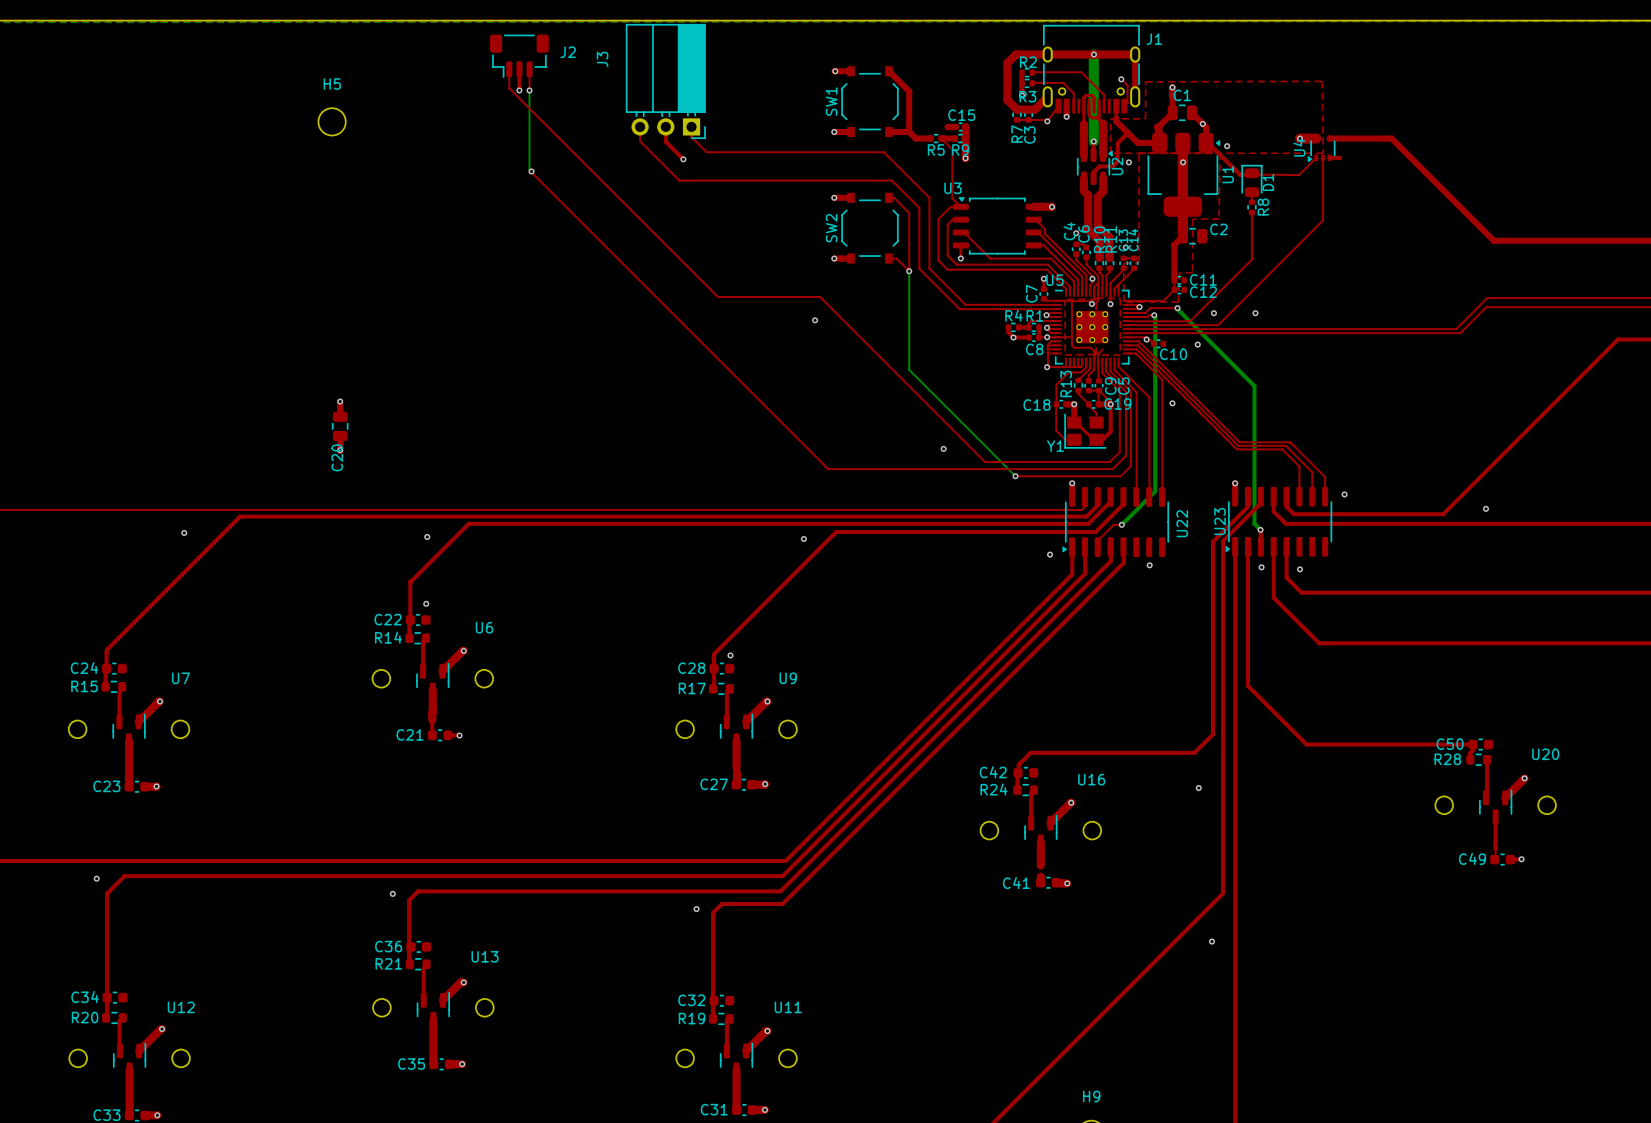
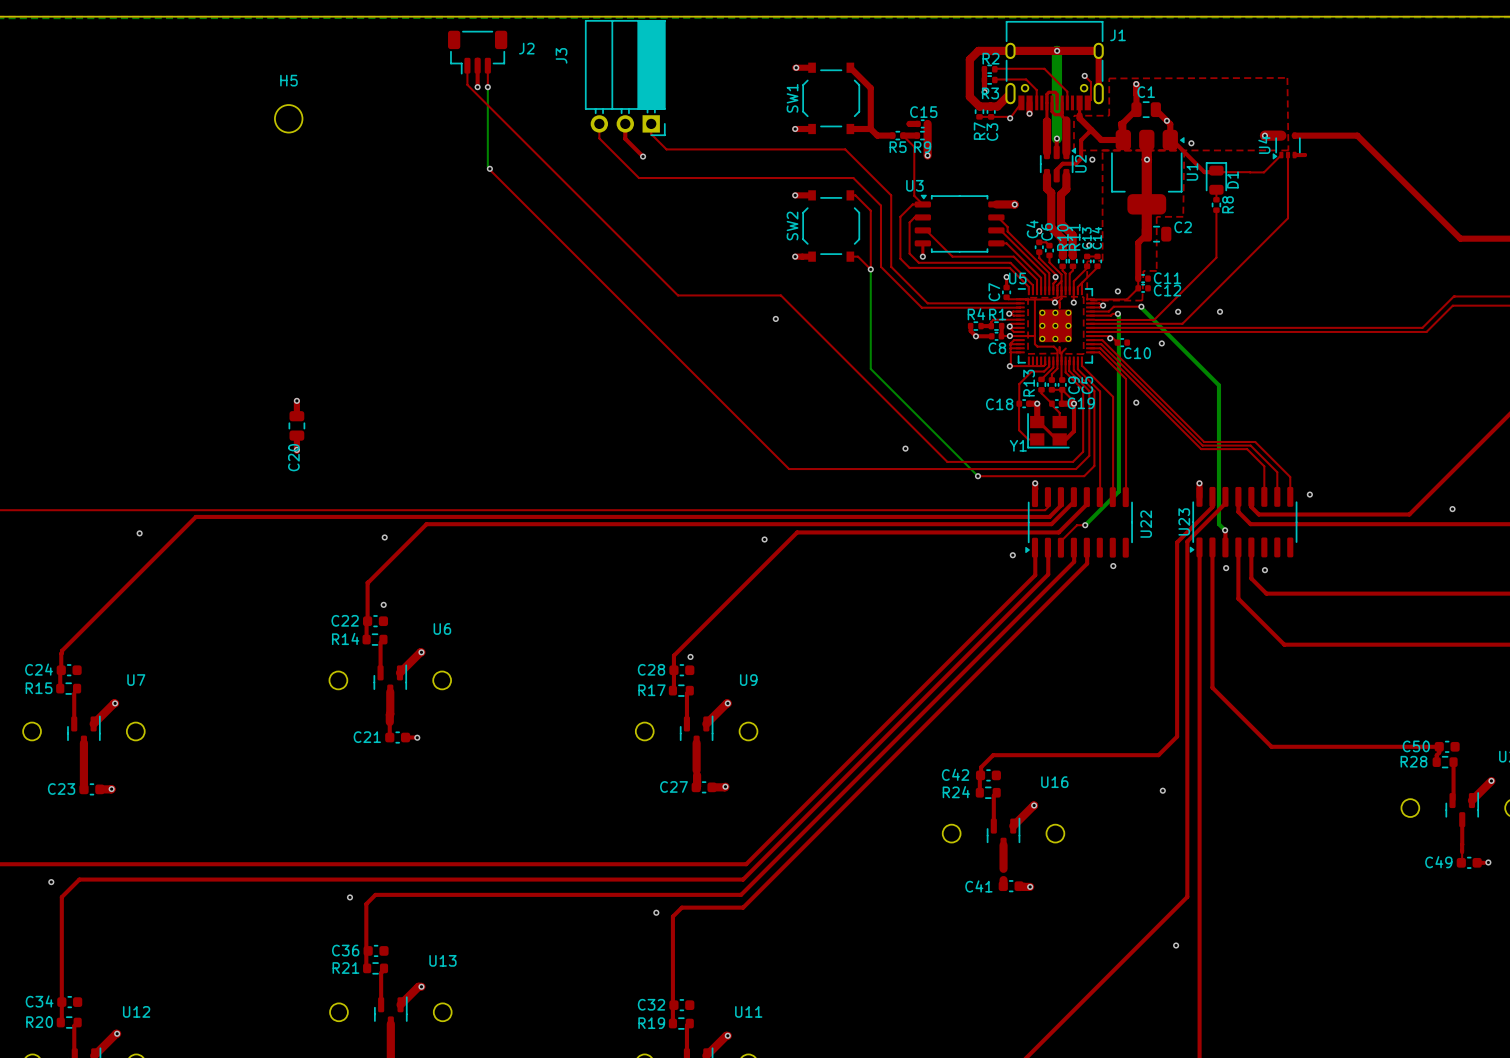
via: none -> (1117, 291)

